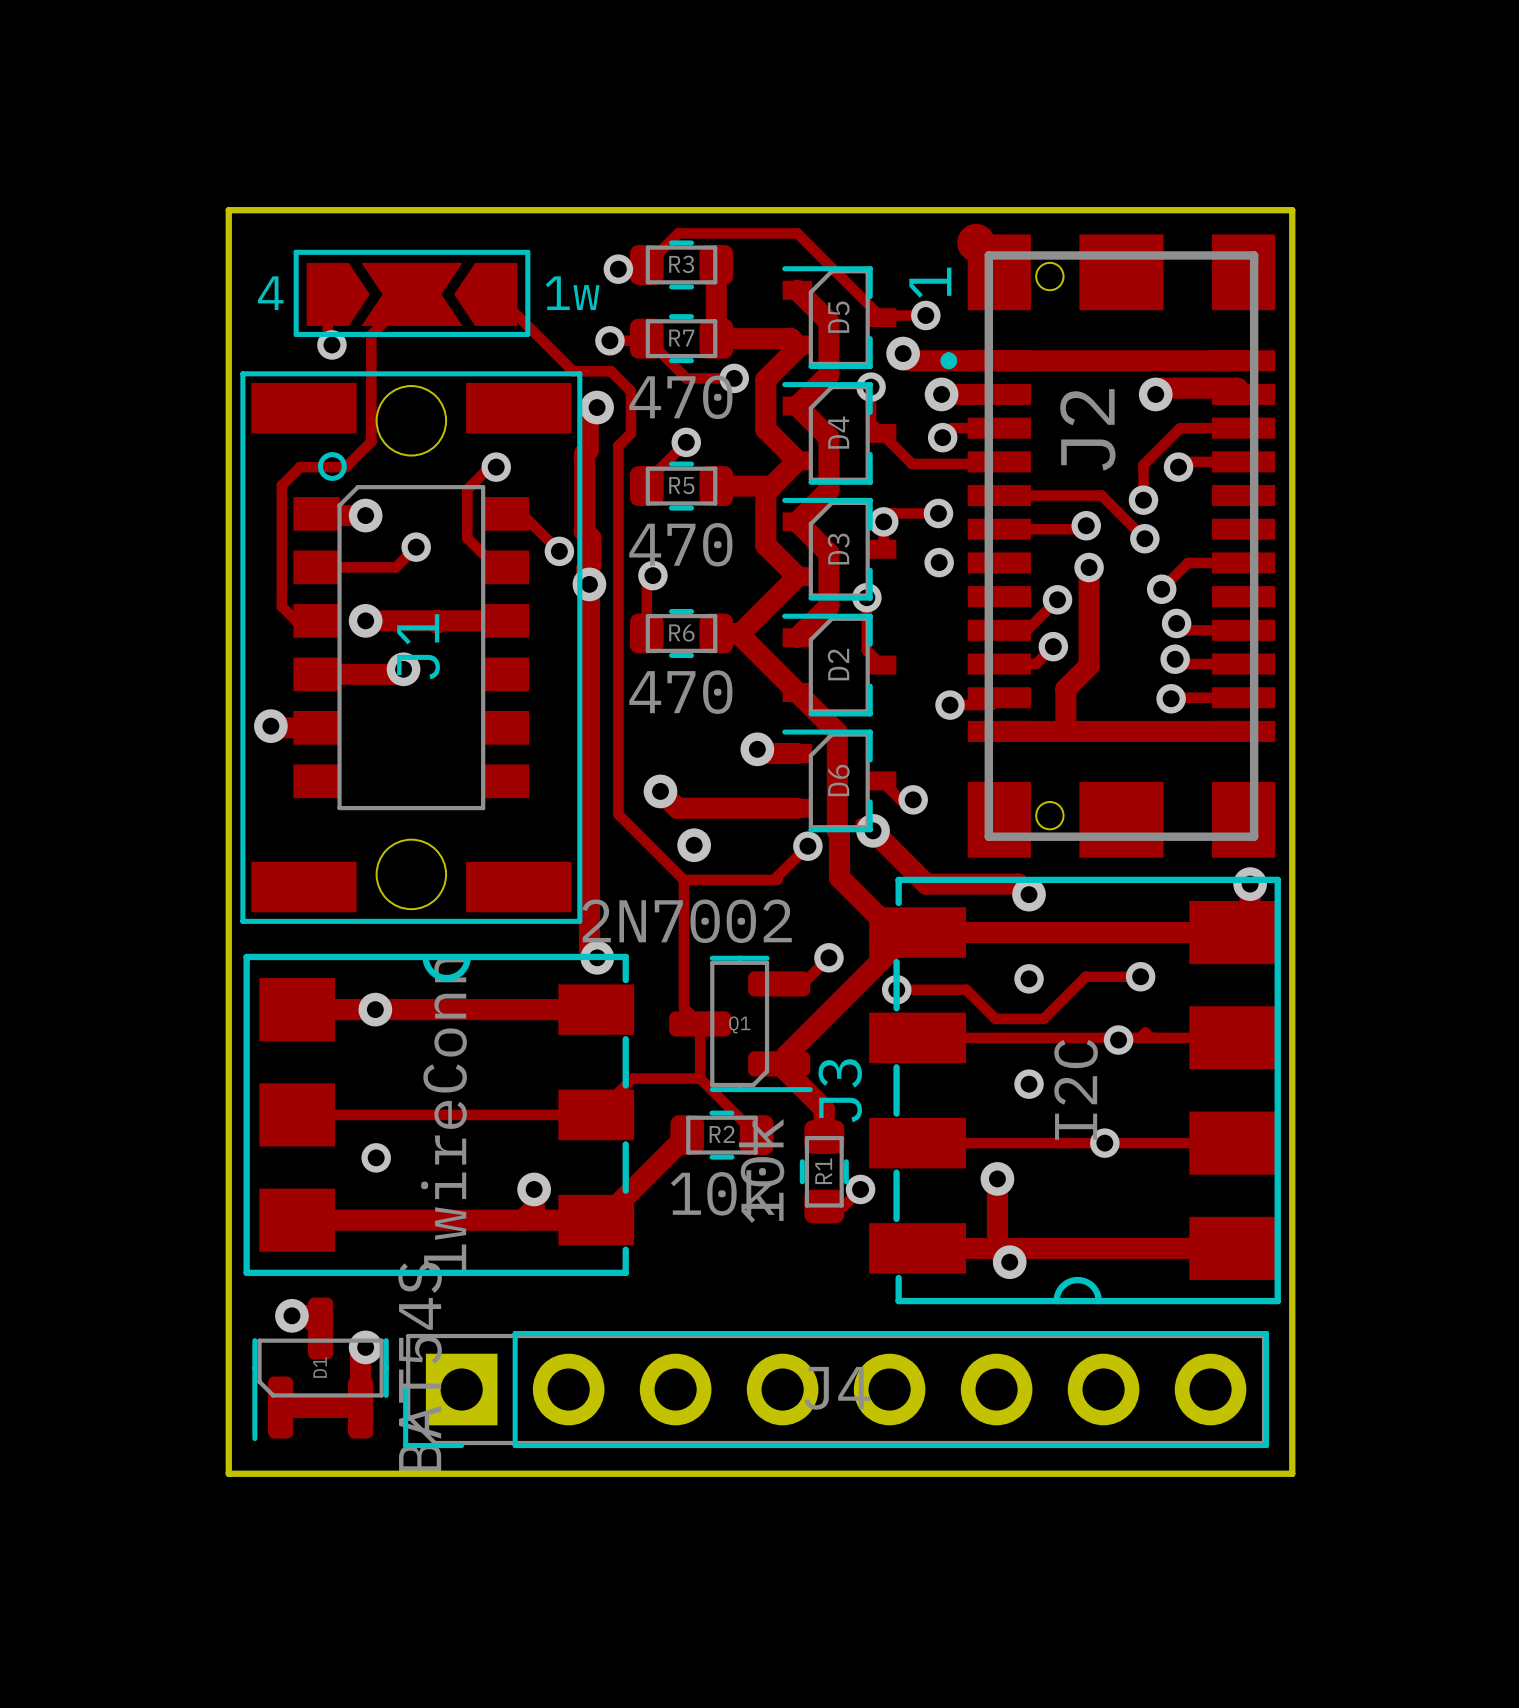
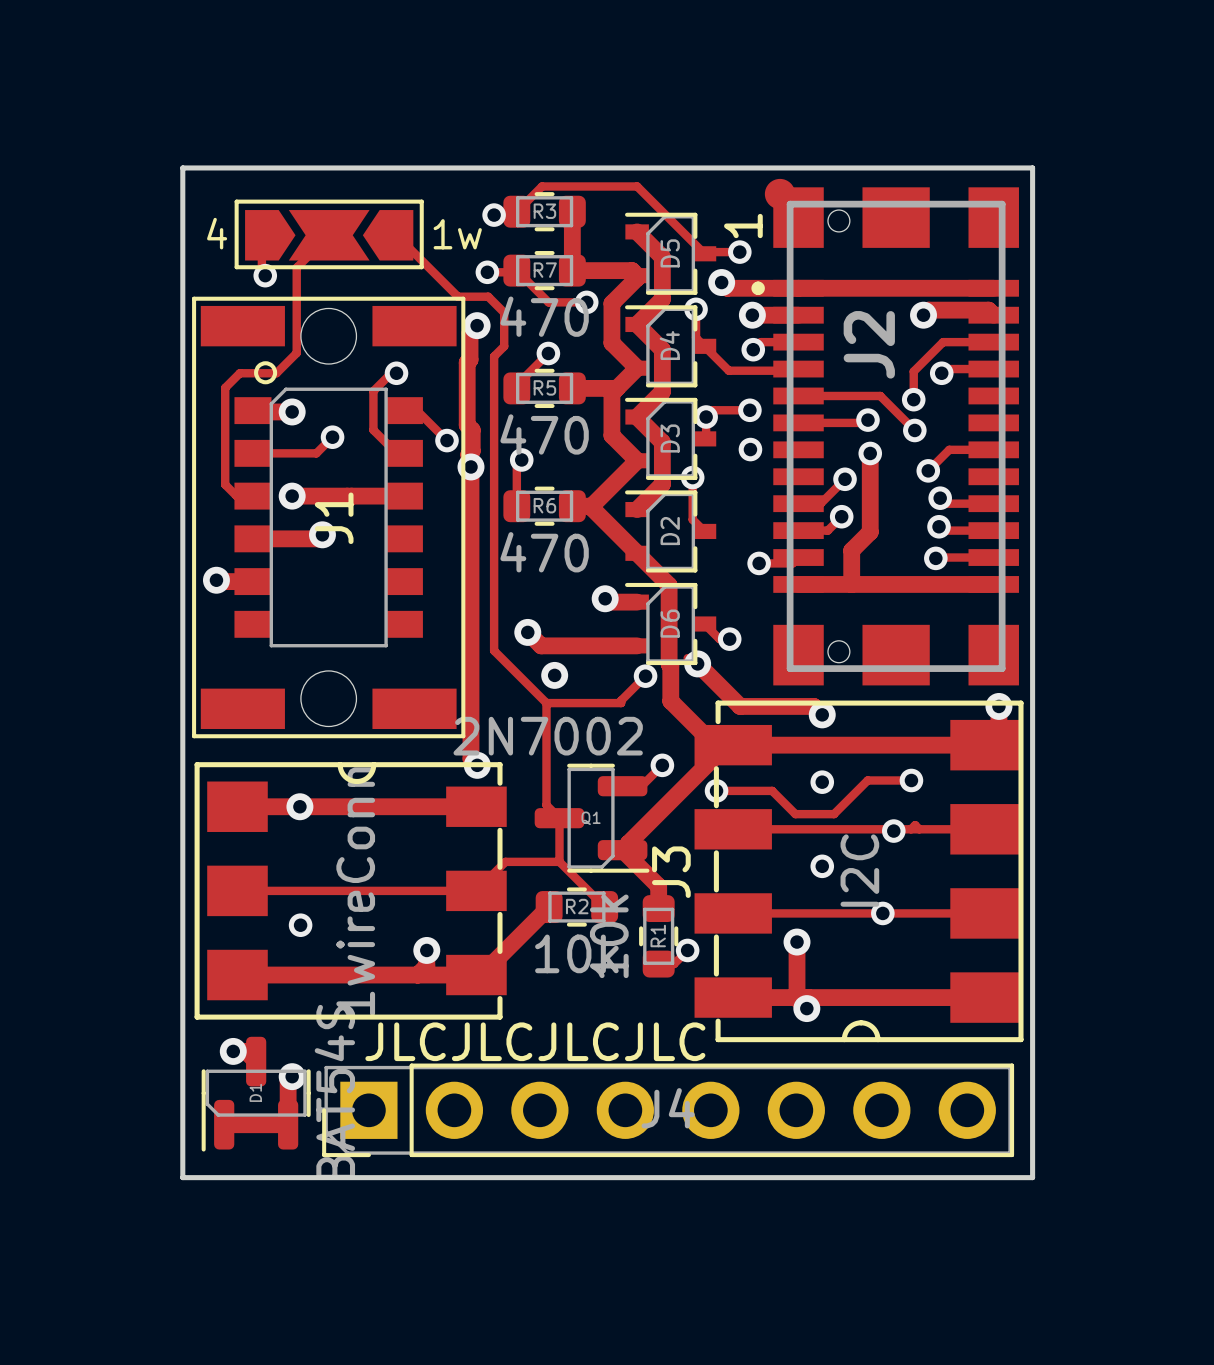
text: none -> JLCJLCJLCJLC (535, 1041)

